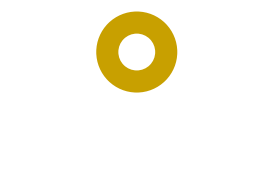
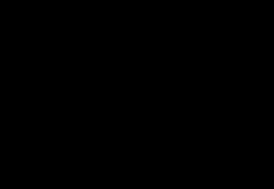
part: (136, 52) -> none

